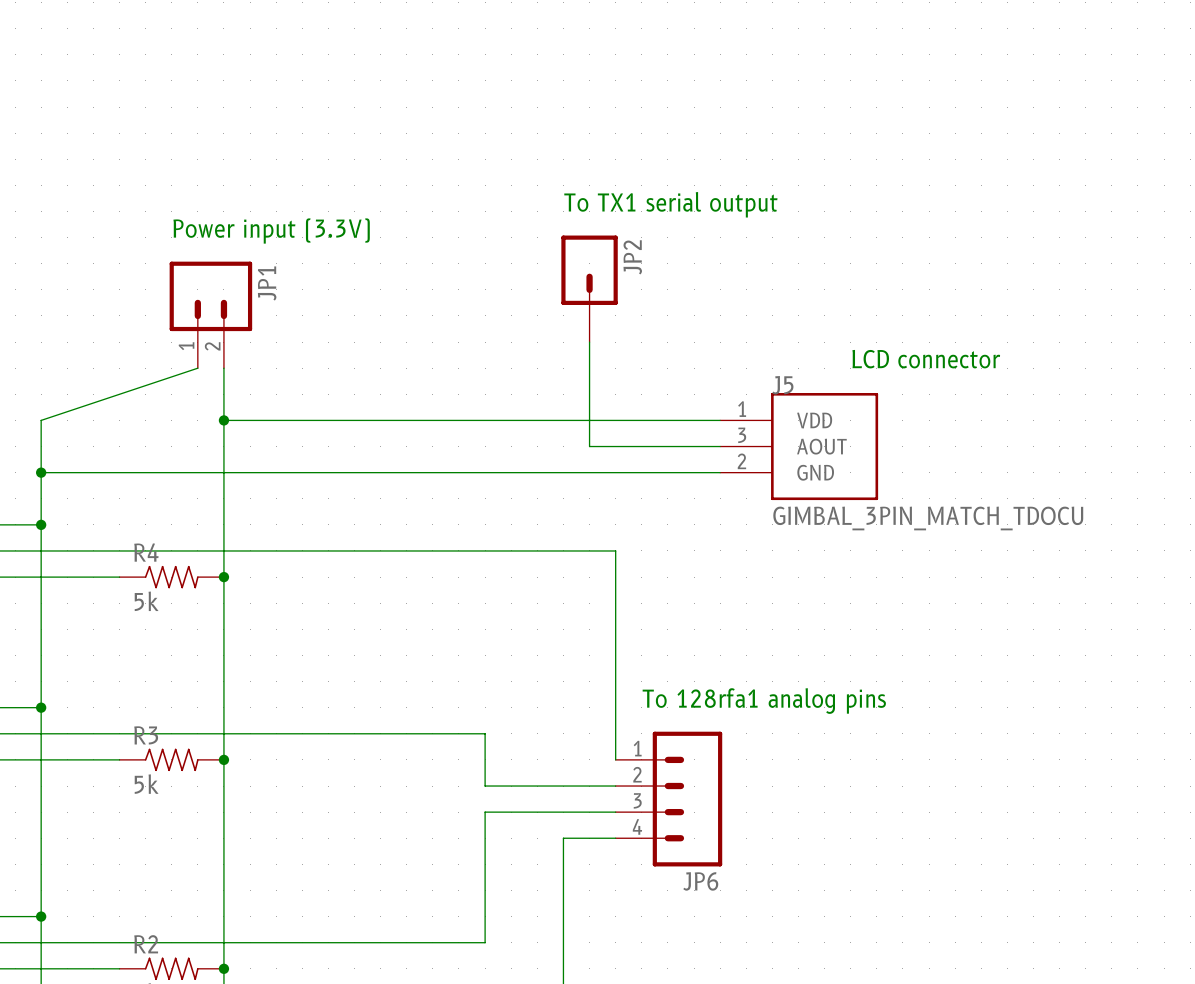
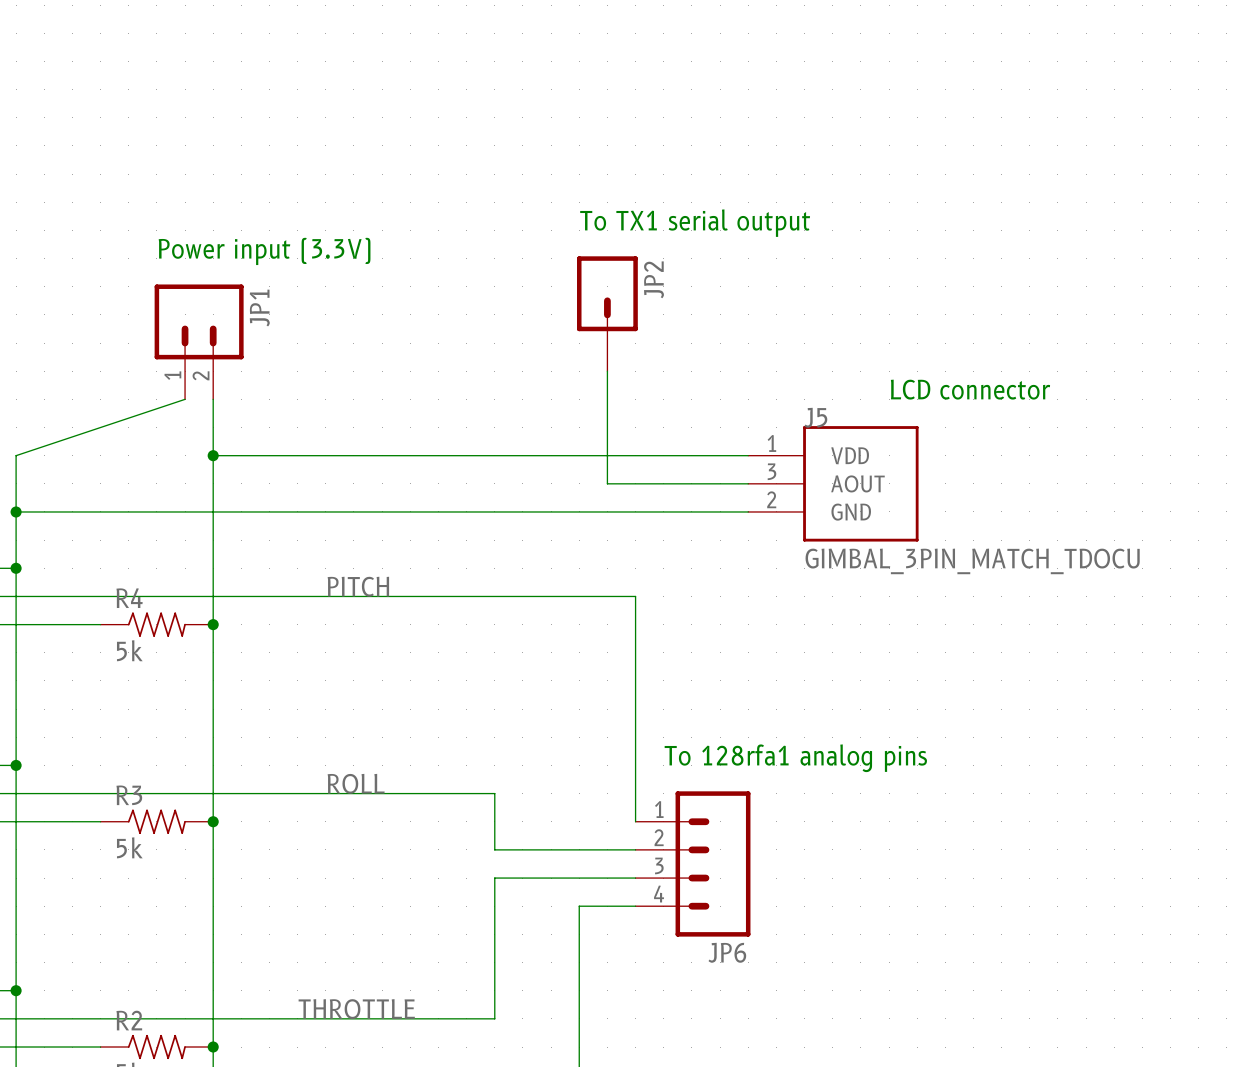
label: none -> PITCH (358, 586)
label: none -> ROLL (356, 783)
label: none -> THROTTLE (356, 1009)

